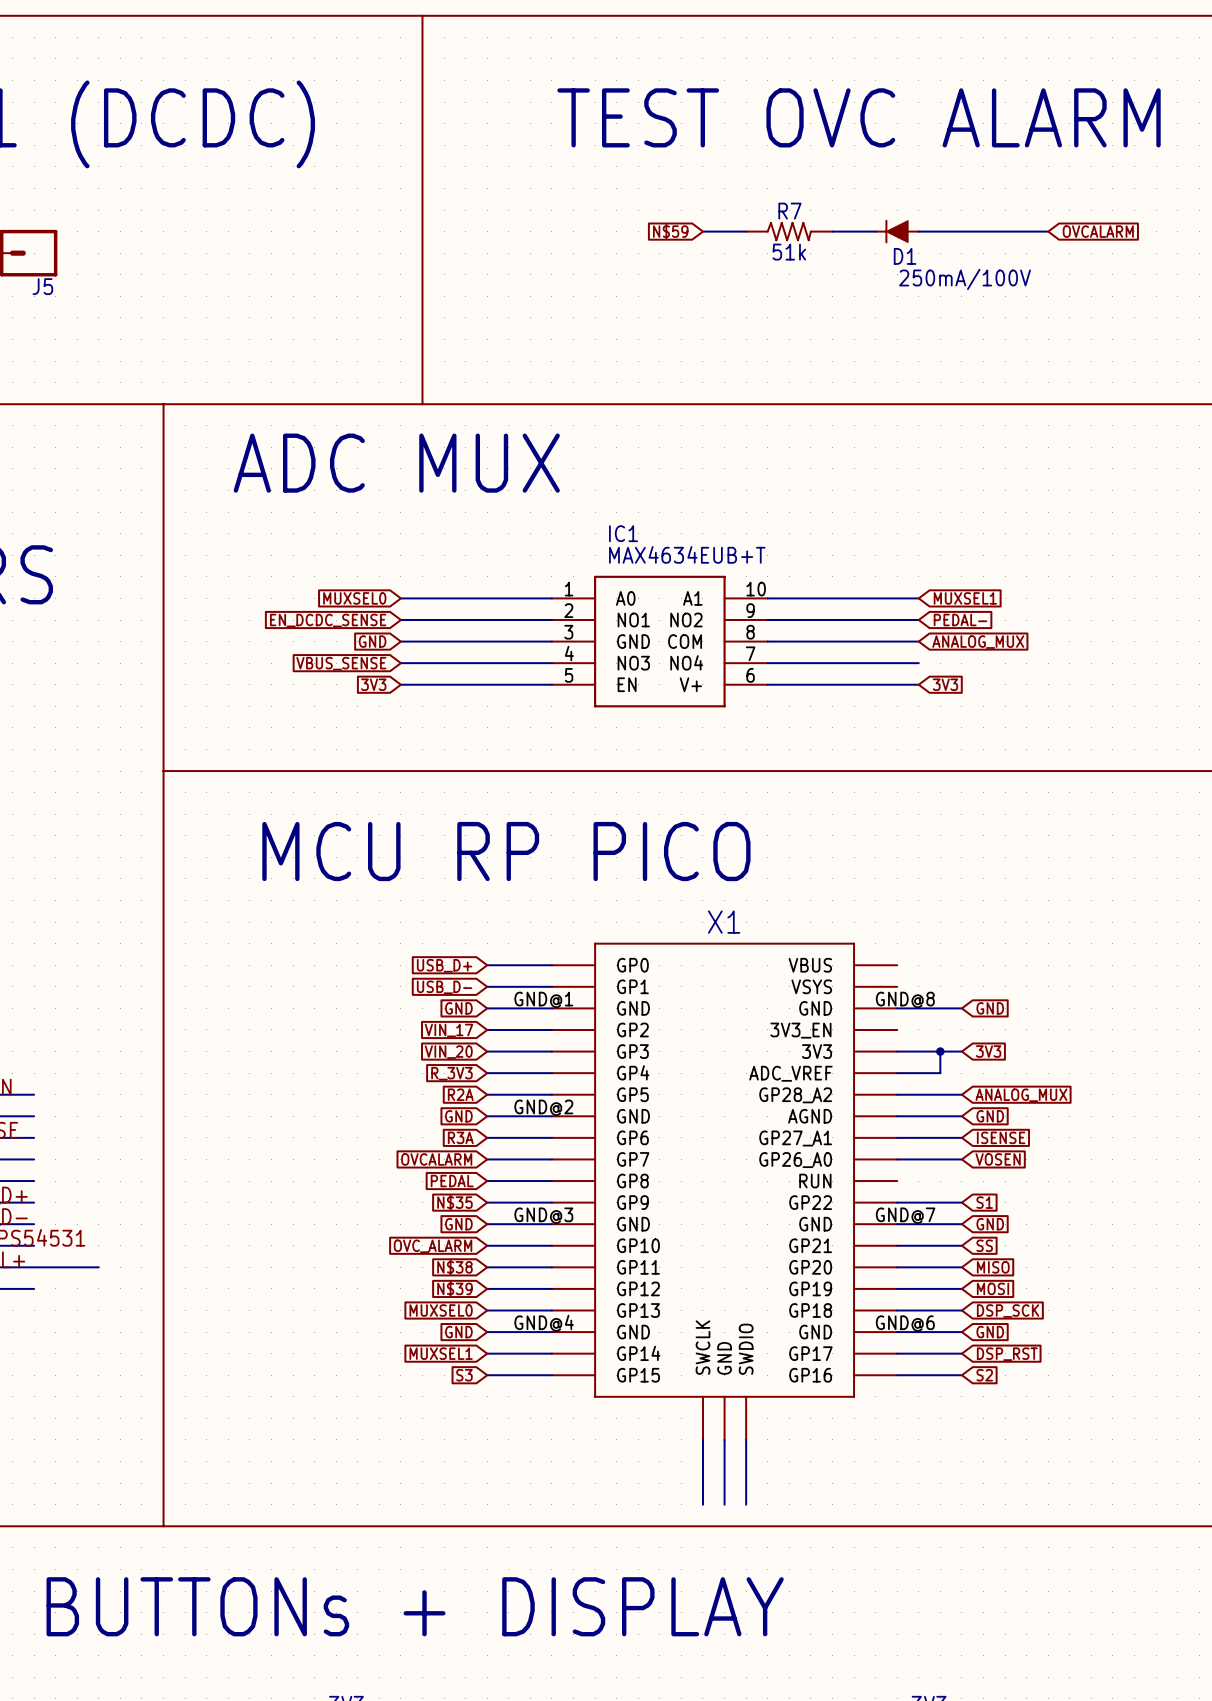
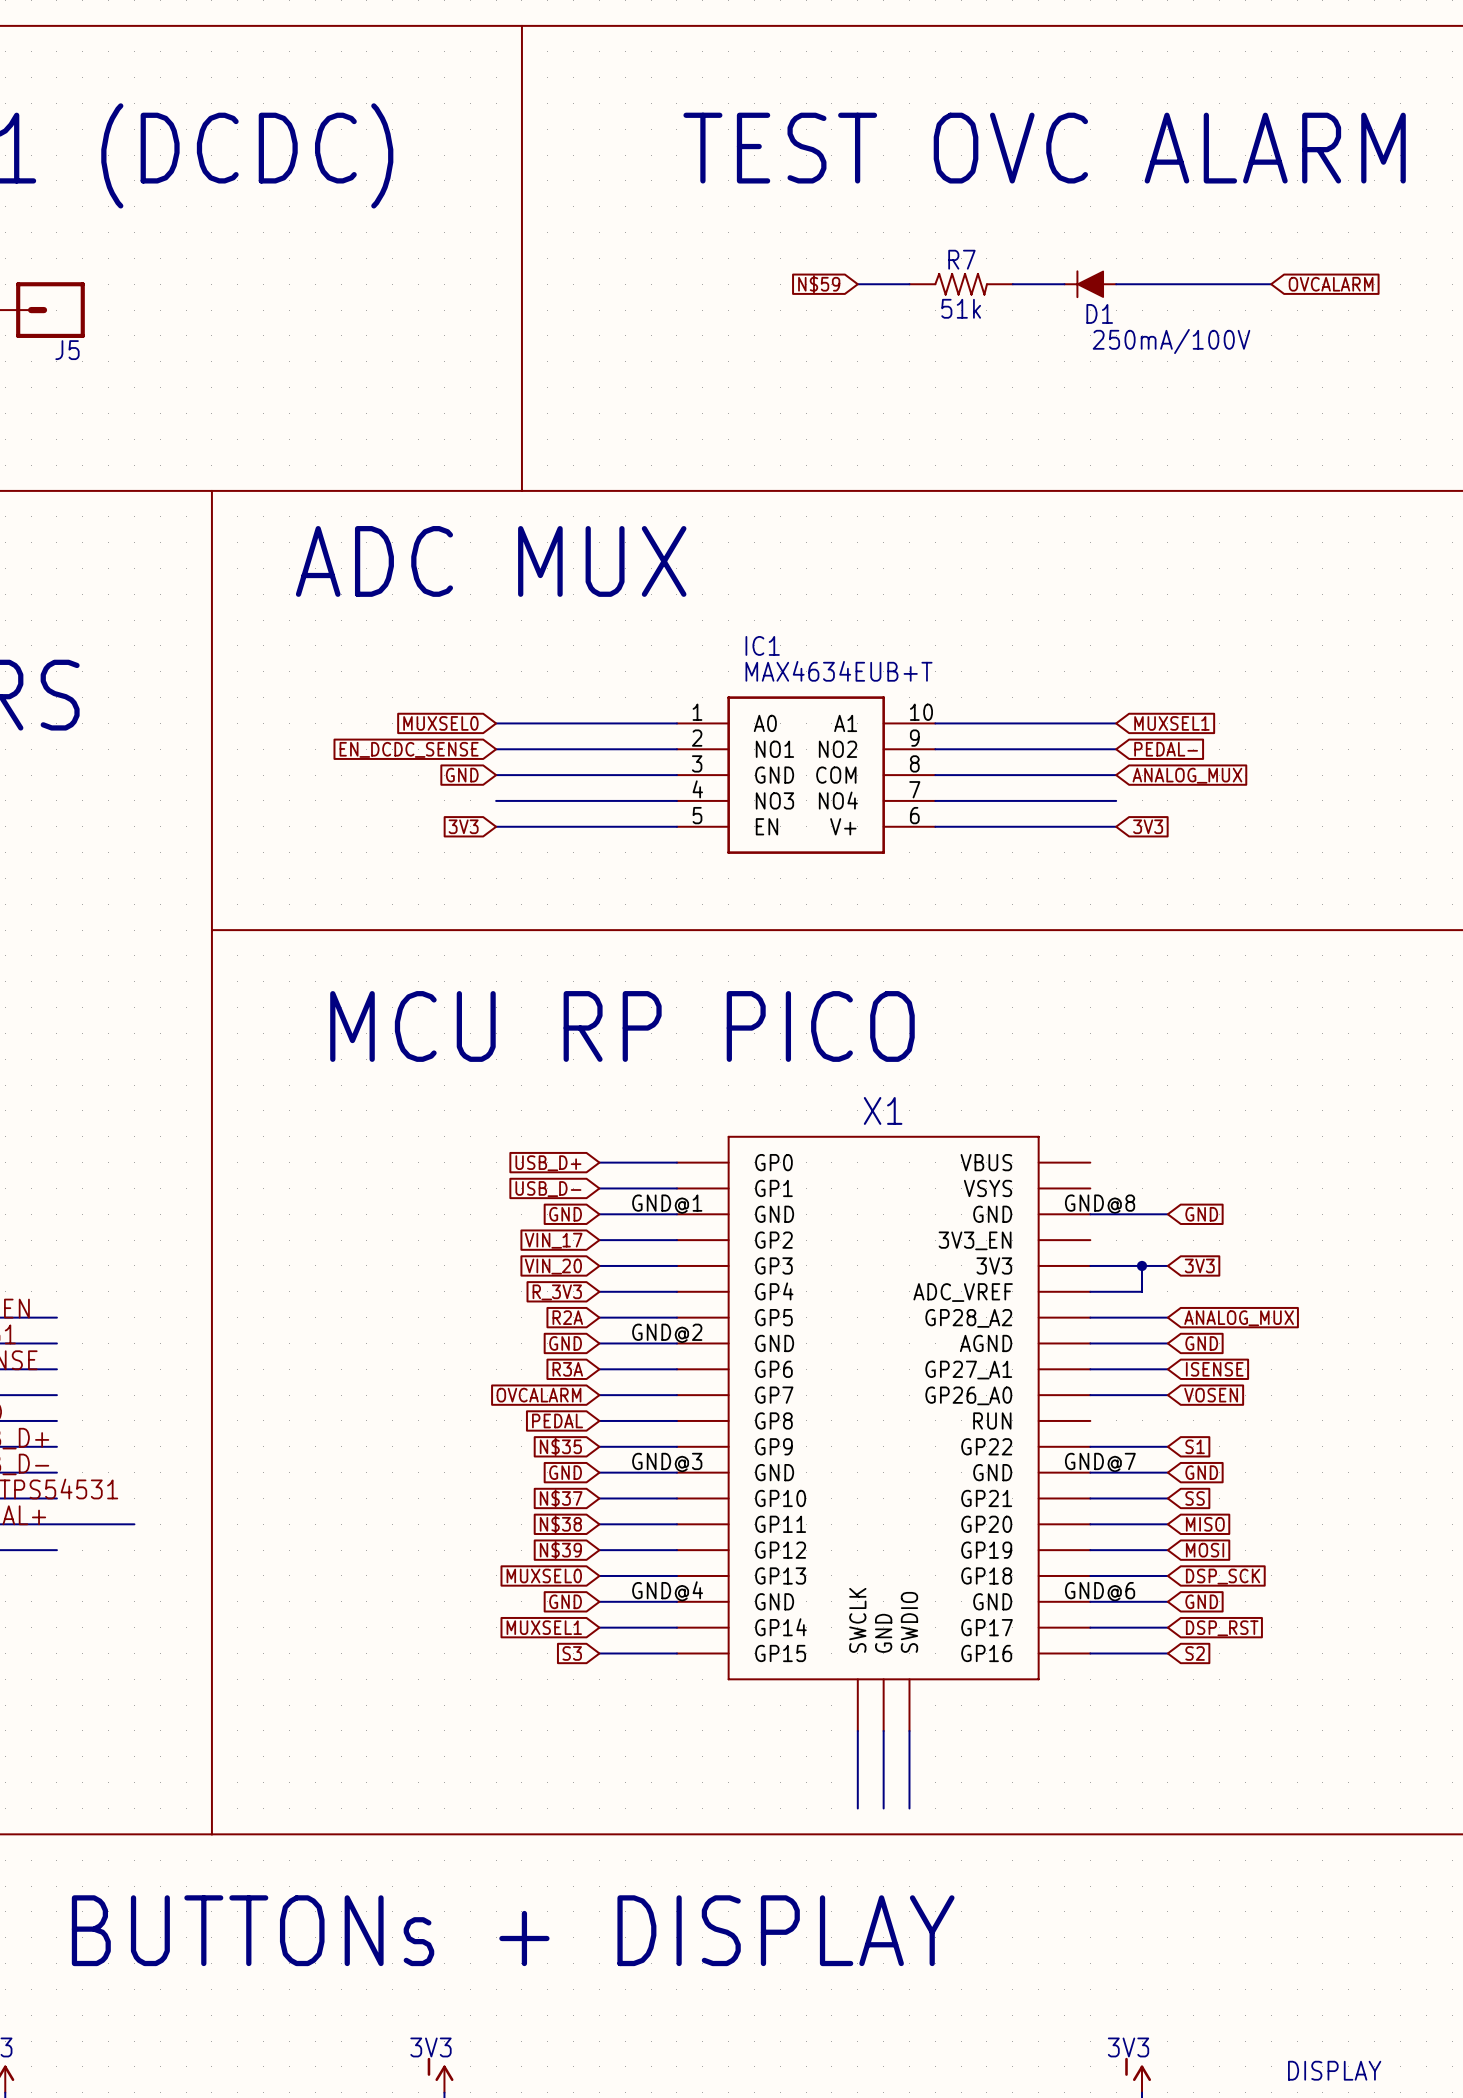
global label: VBUS_SENSE (341, 663) -> none
global label: OVC_ALARM (433, 1246) -> N$37 (561, 1498)

